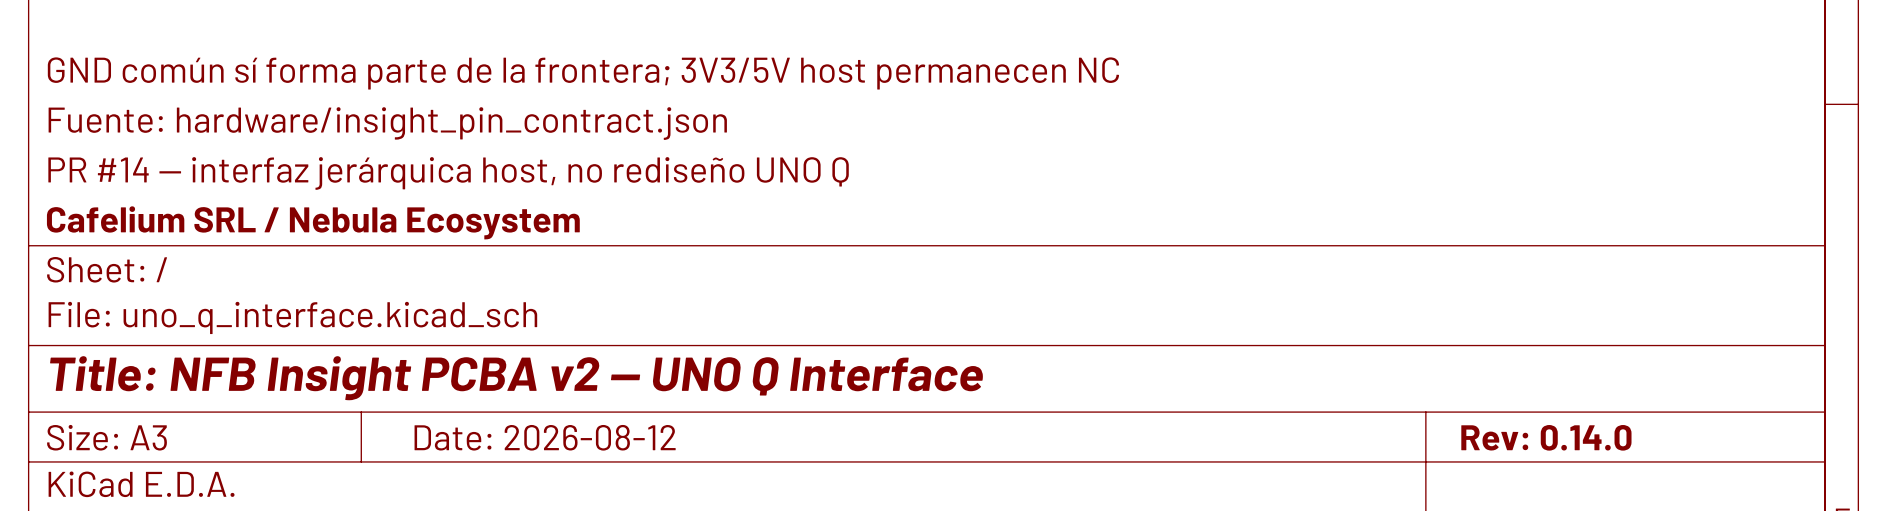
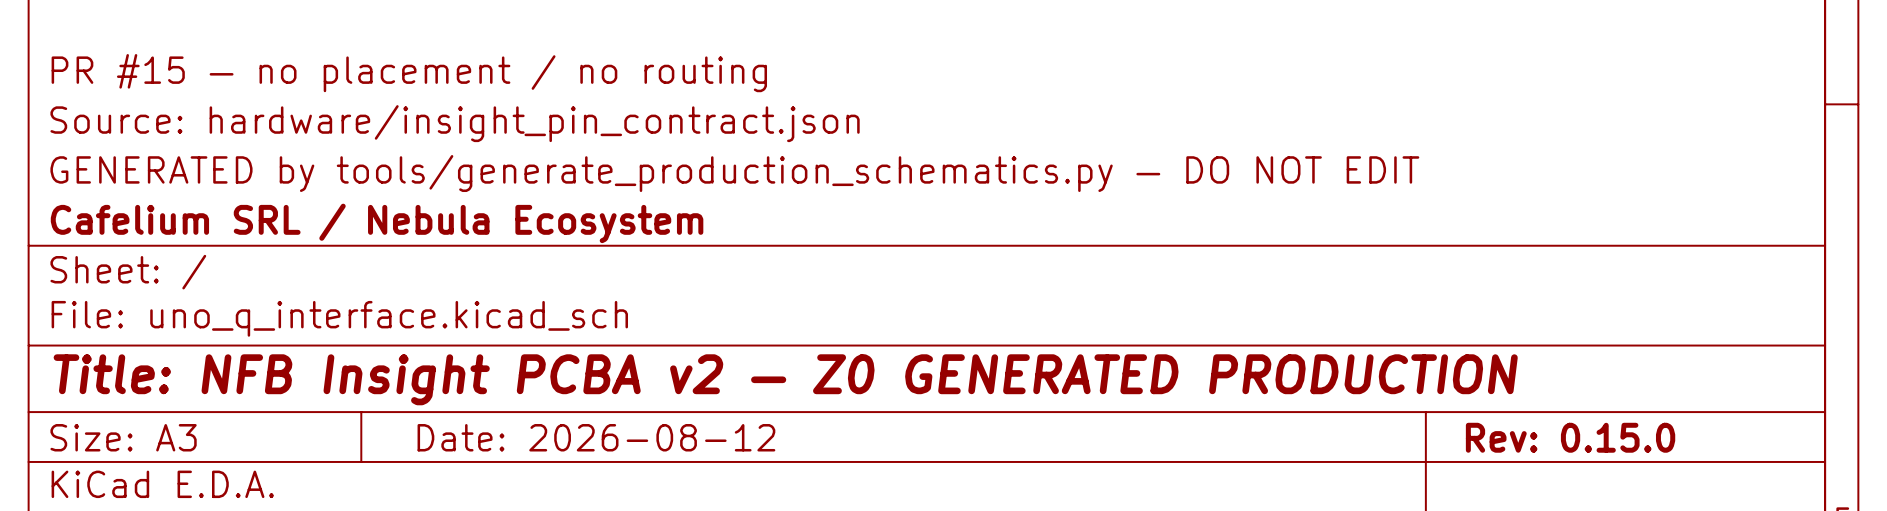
title block: GND común sí forma parte de la frontera; 3V3/5V host permanecen NC (583, 73) -> PR #15 — no placement / no routing (409, 73)
title block: Fuente: hardware/insight_pin_contract.json (387, 123) -> Source: hardware/insight_pin_contract.json (455, 123)
title block: PR #14 — interfaz jerárquica host, no rediseño UNO Q (448, 173) -> GENERATED by tools/generate_production_schematics.py — DO NOT EDIT (734, 173)
title block: Title: NFB Insight PCBA v2 — UNO Q Interface (516, 378) -> Title: NFB Insight PCBA v2 — Z0 GENERATED PRODUCTION (785, 379)
title block: Rev: 0.14.0 (1546, 437) -> Rev: 0.15.0 (1570, 437)

